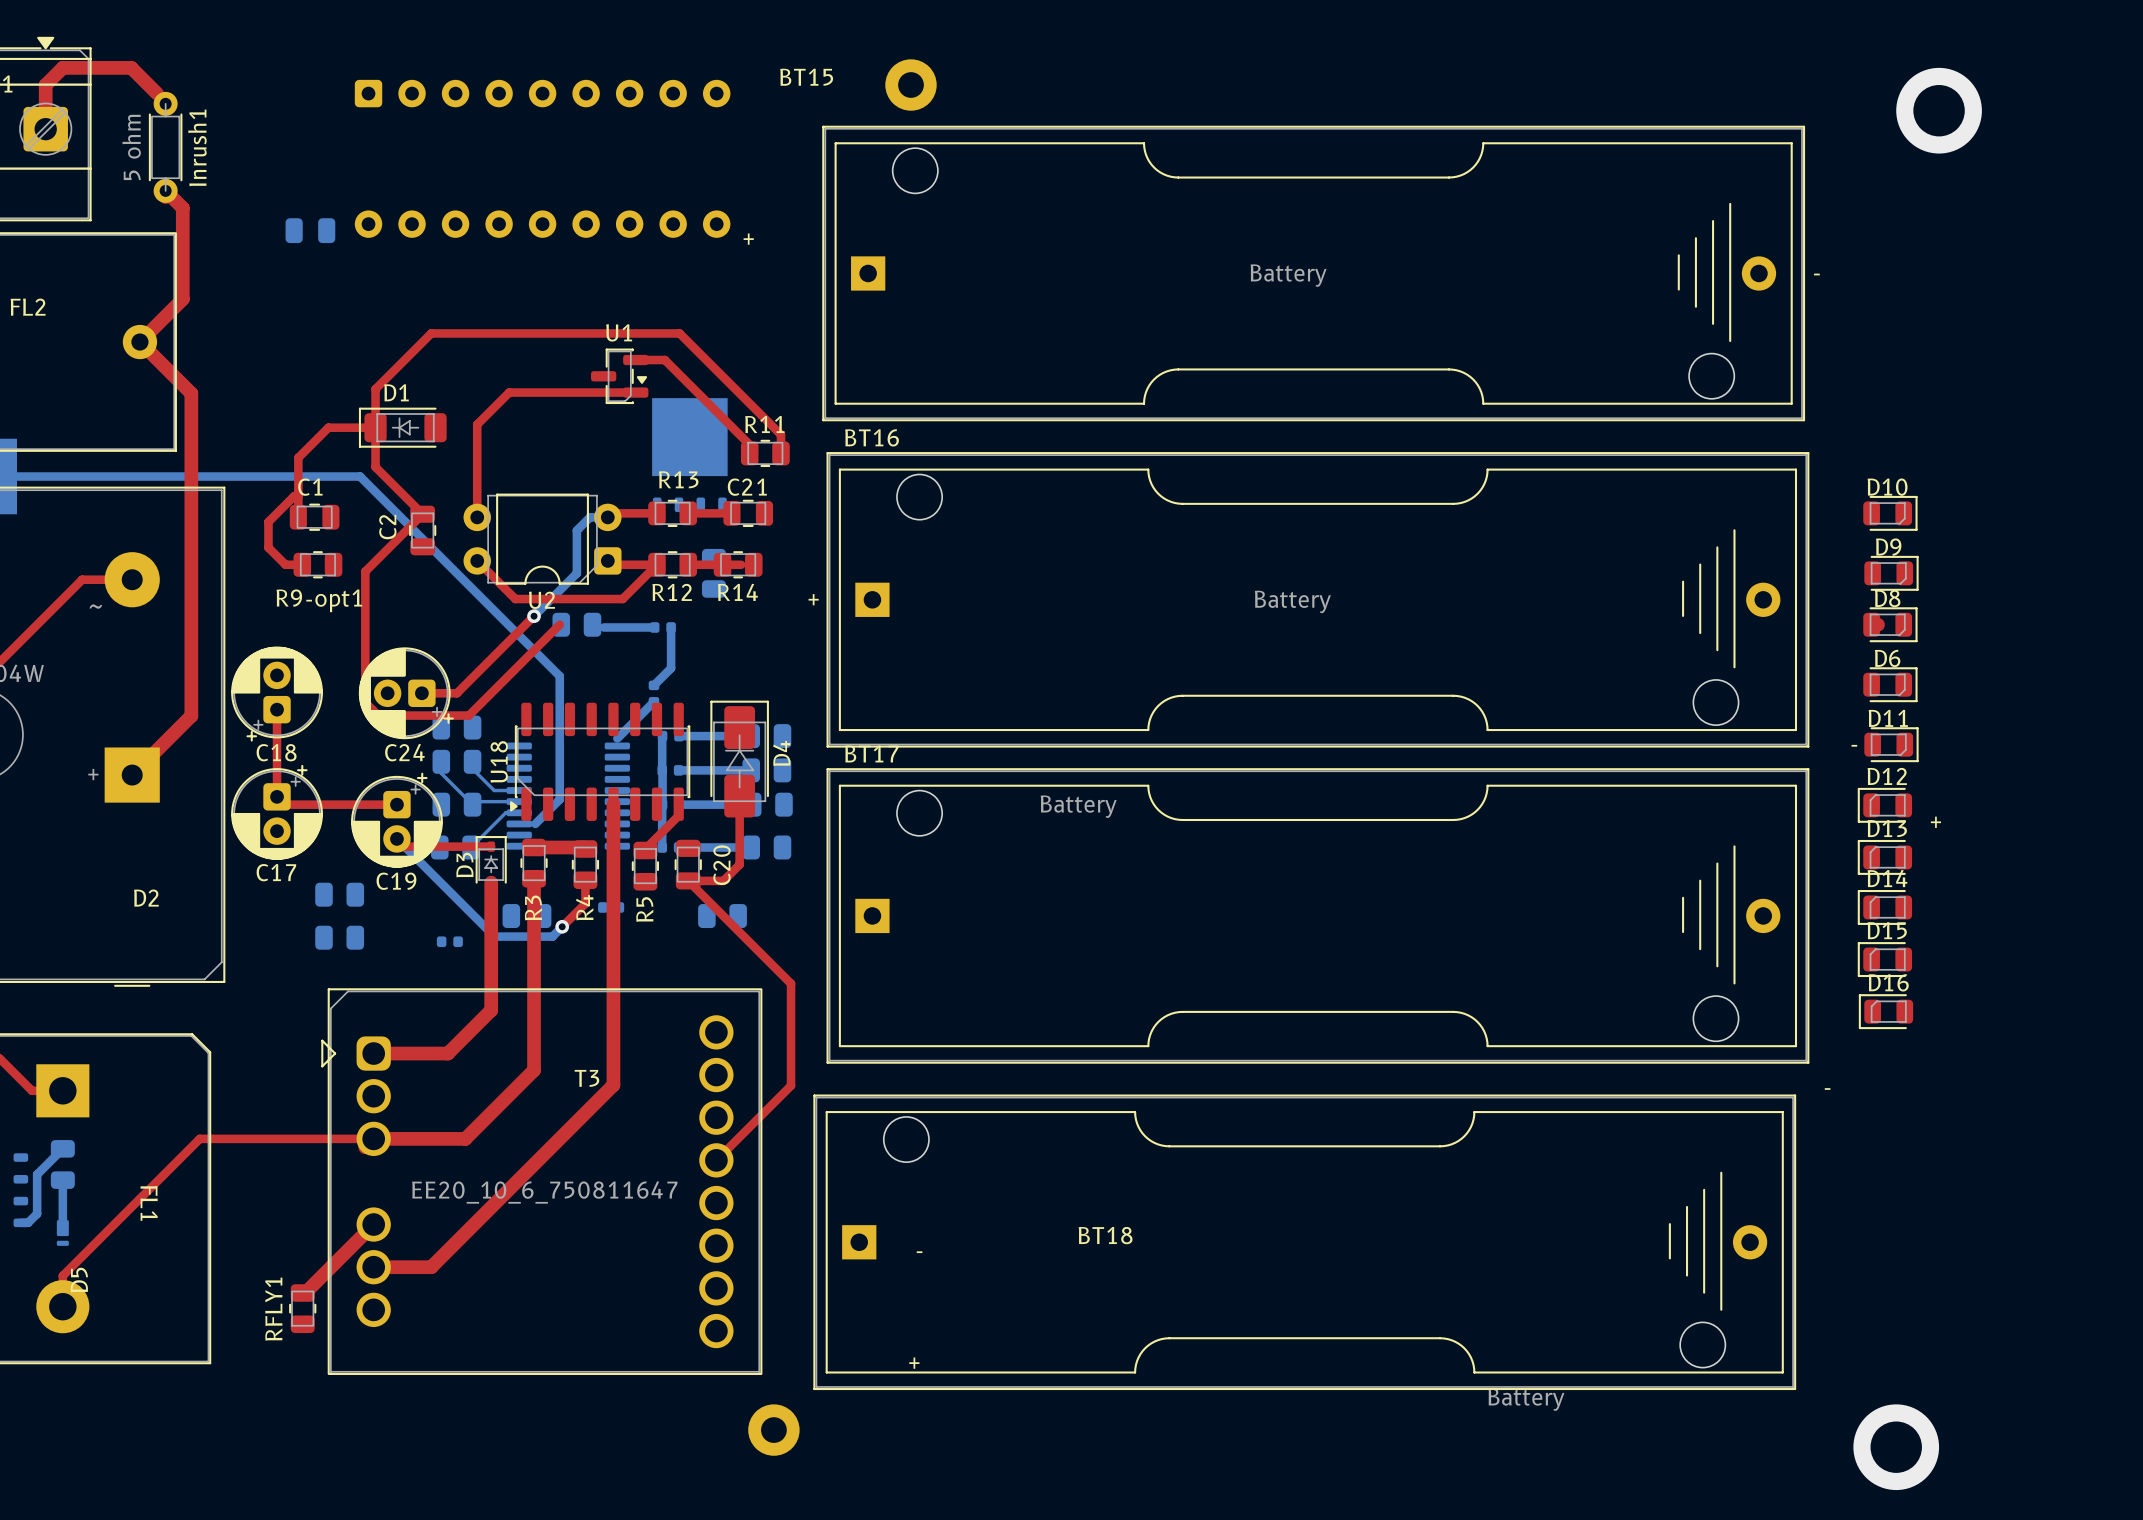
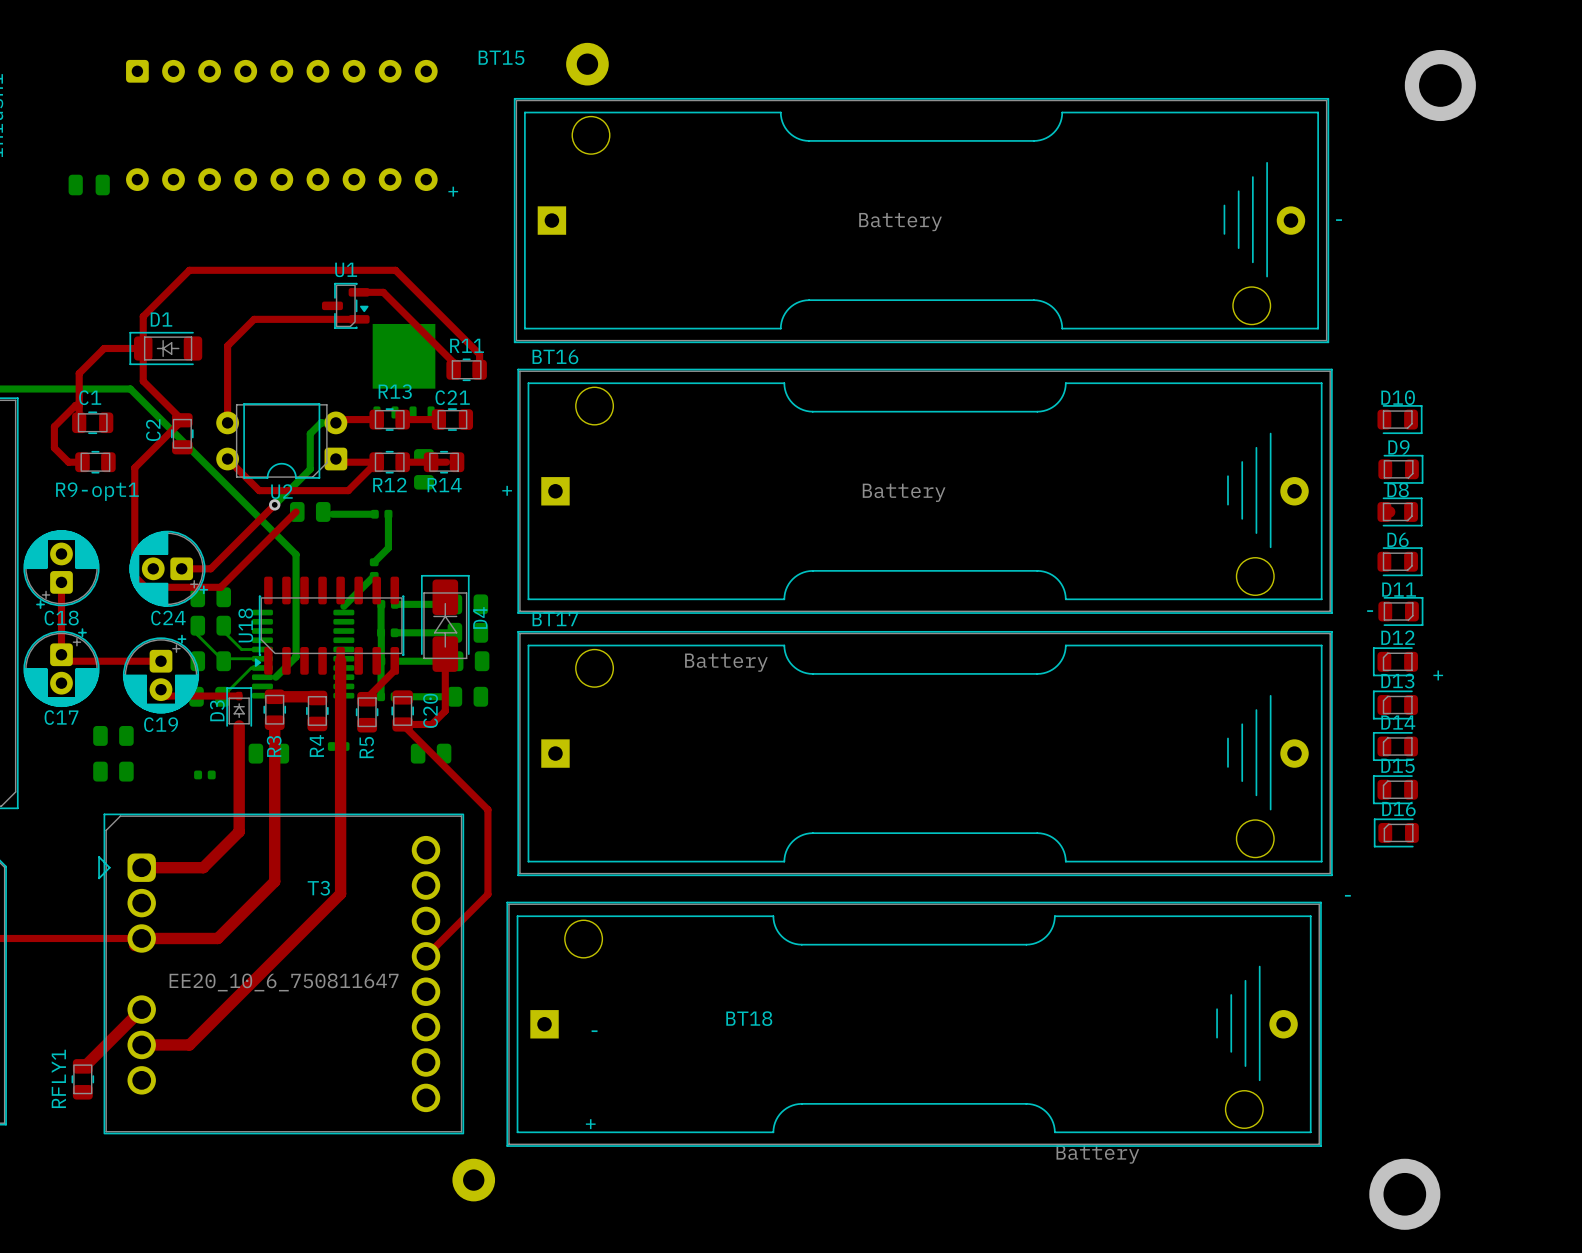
bottom track: (396, 838) (494, 936) (552, 936) (562, 926) -> none
top track: (585, 880) (585, 903) (562, 926) -> none
via: (562, 926) -> none

